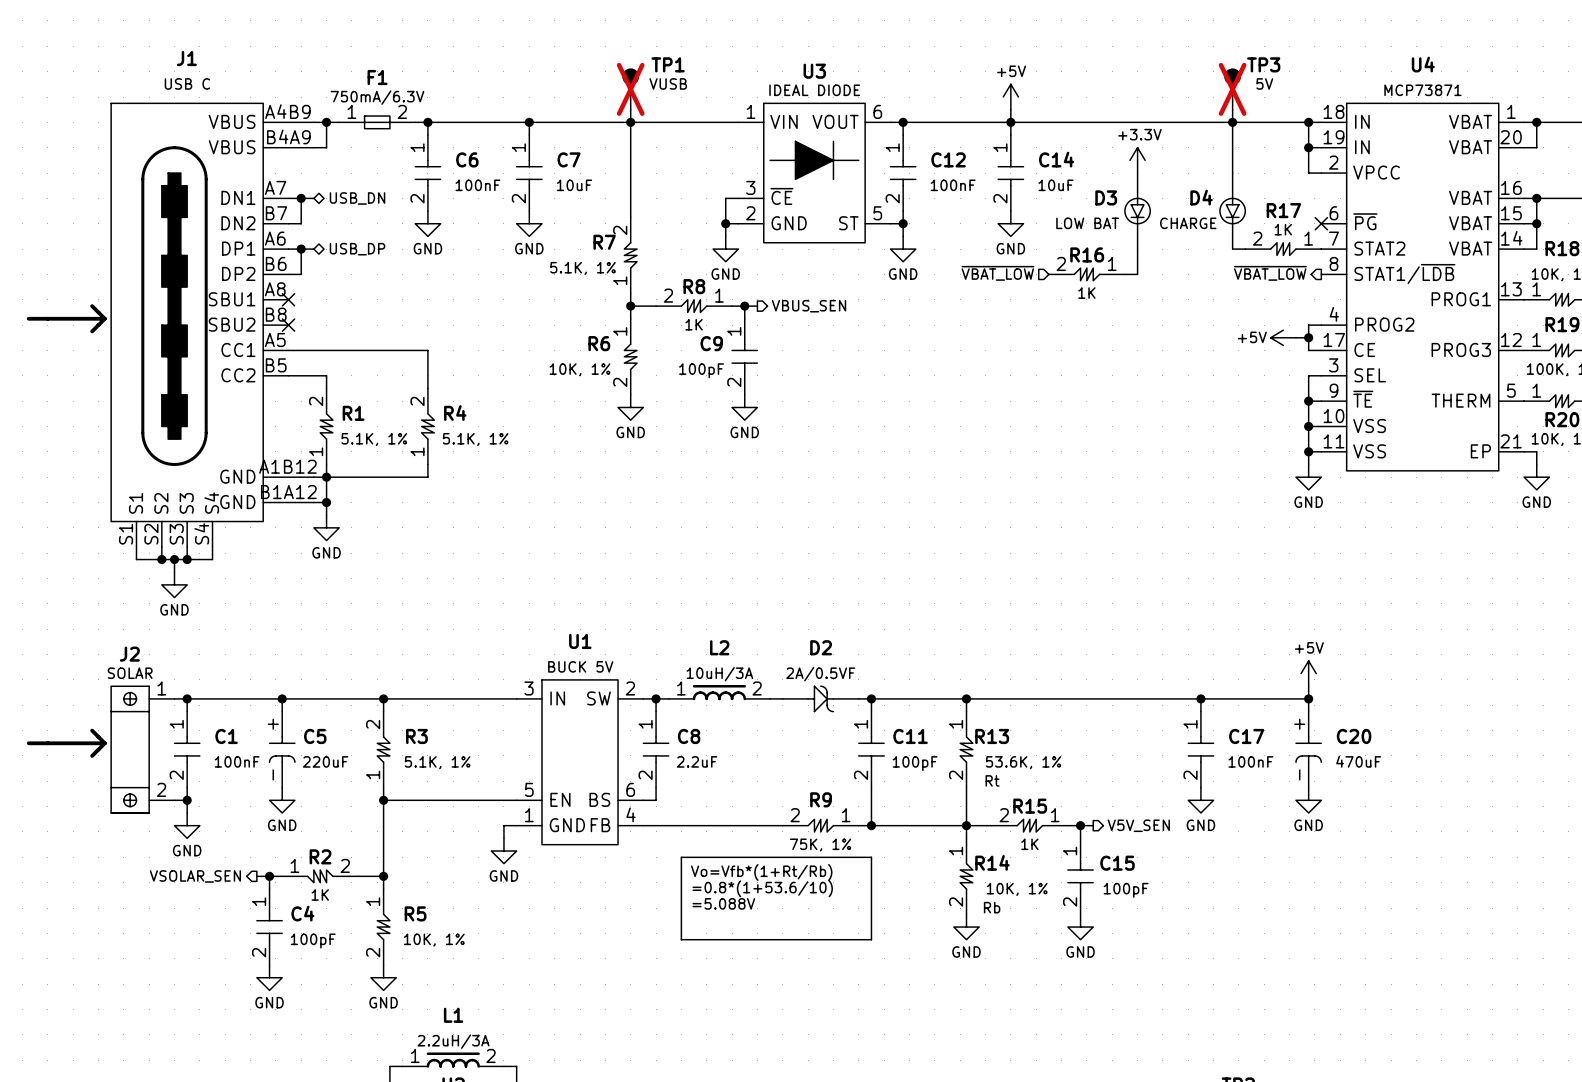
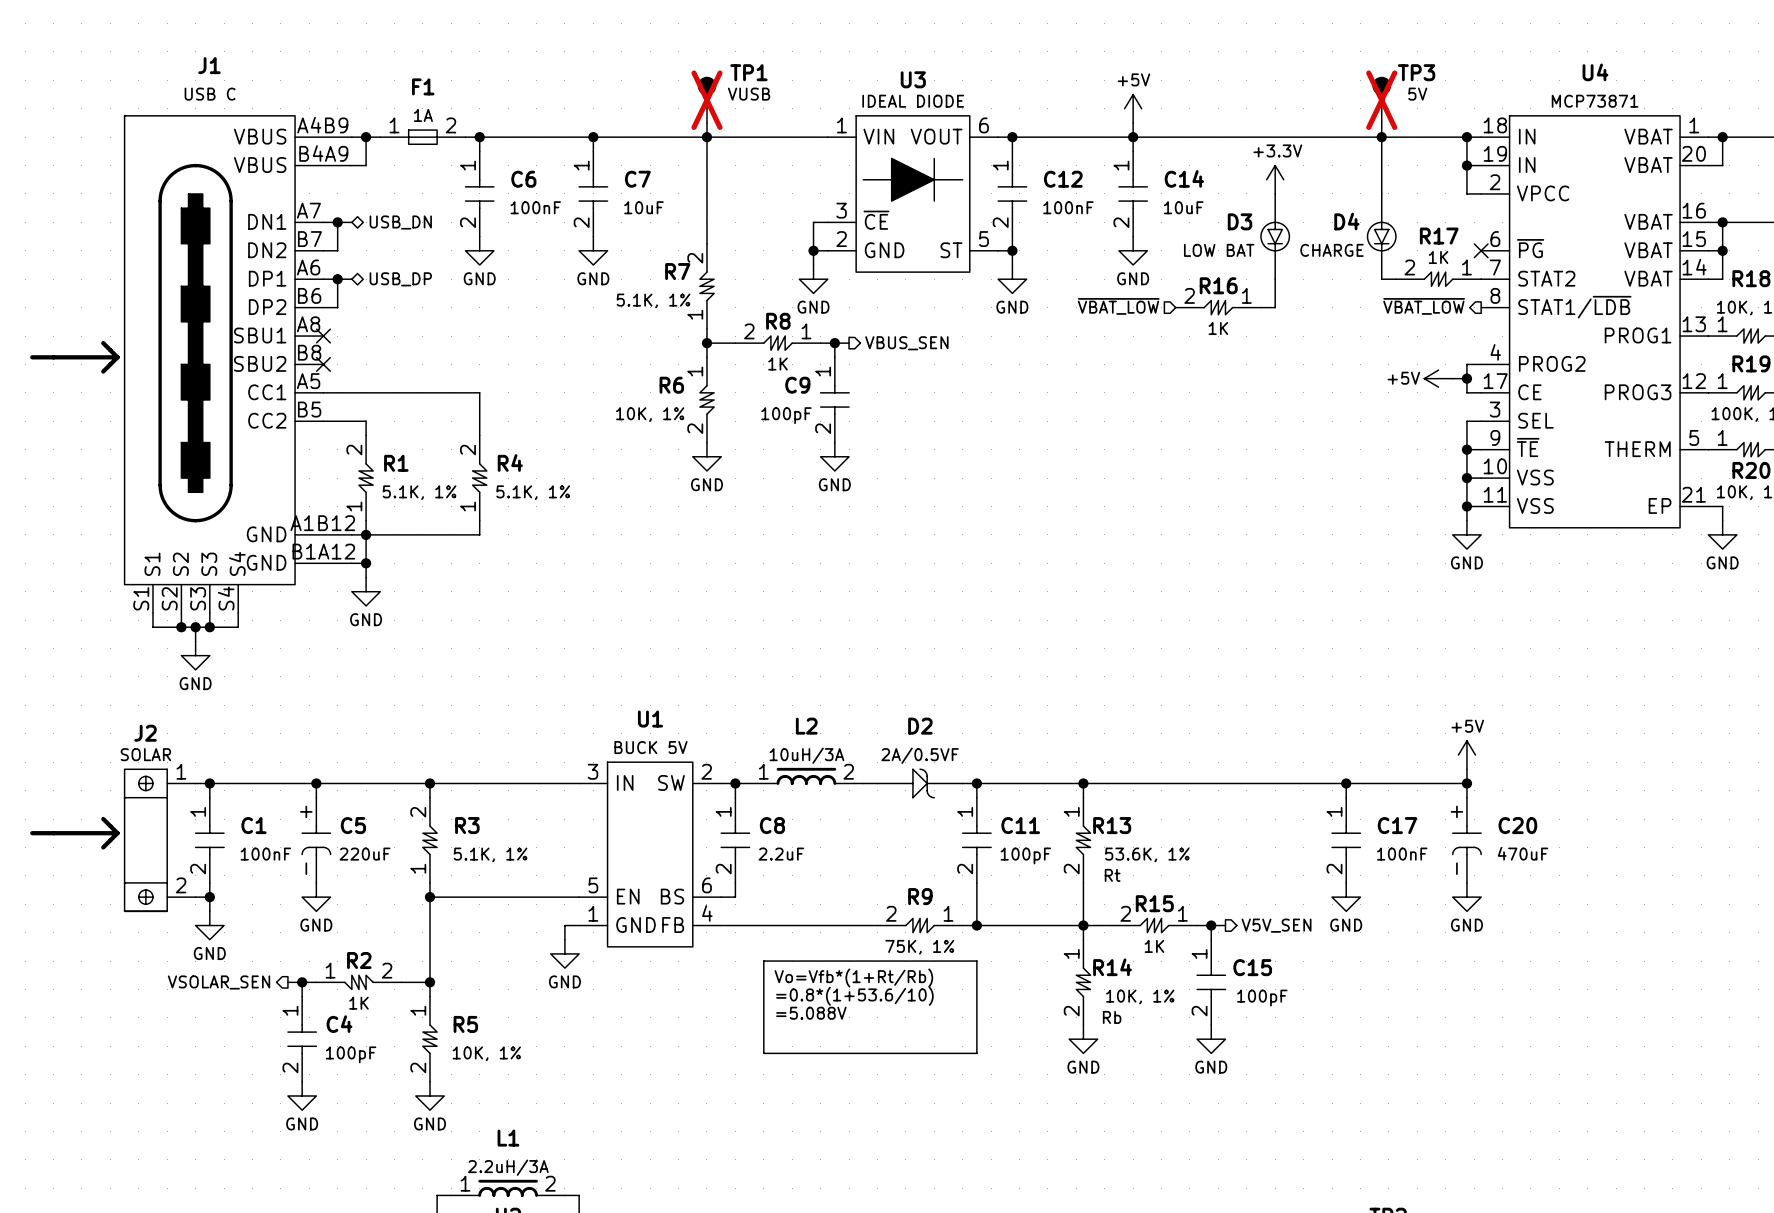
F1 value: 750mA/6.3V (377, 97) -> 1A (423, 115)

